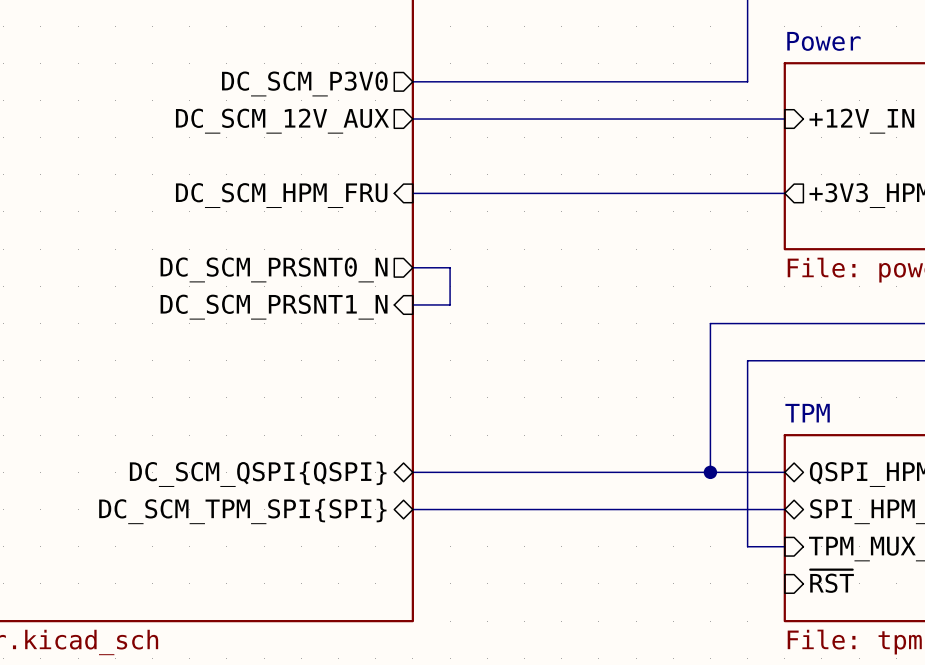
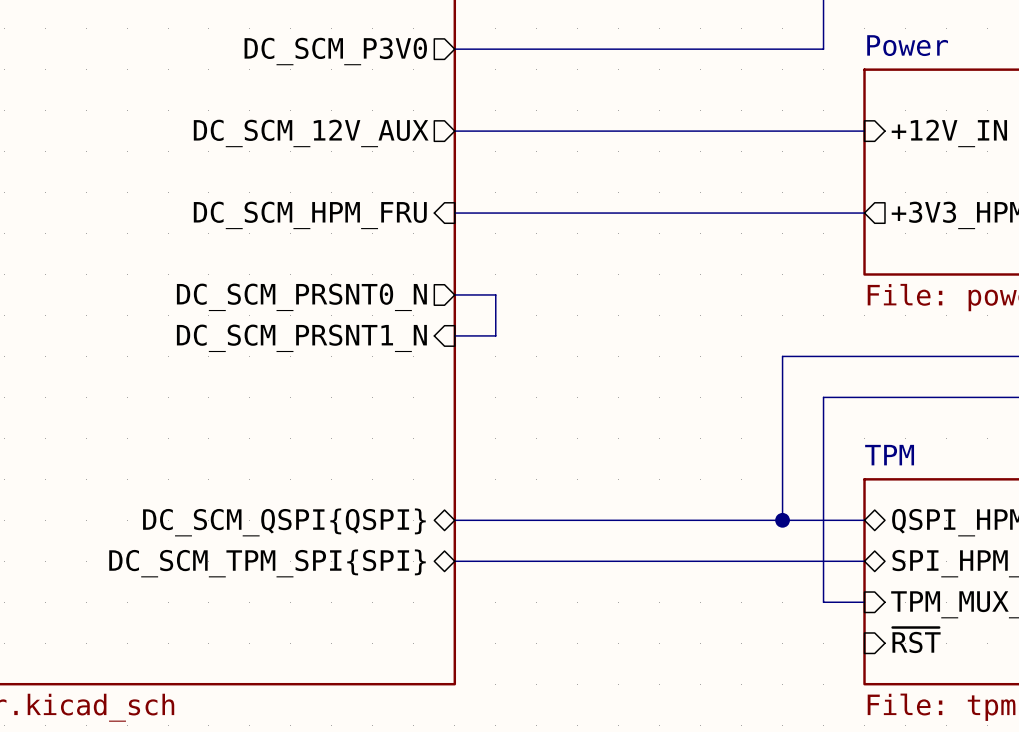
wire: (747, 44) (747, 81) (412, 81) -> (823, 49) (454, 49)
sheet pin position: DC_SCM_P3V0 (304, 83) -> DC_SCM_P3V0 (335, 51)

